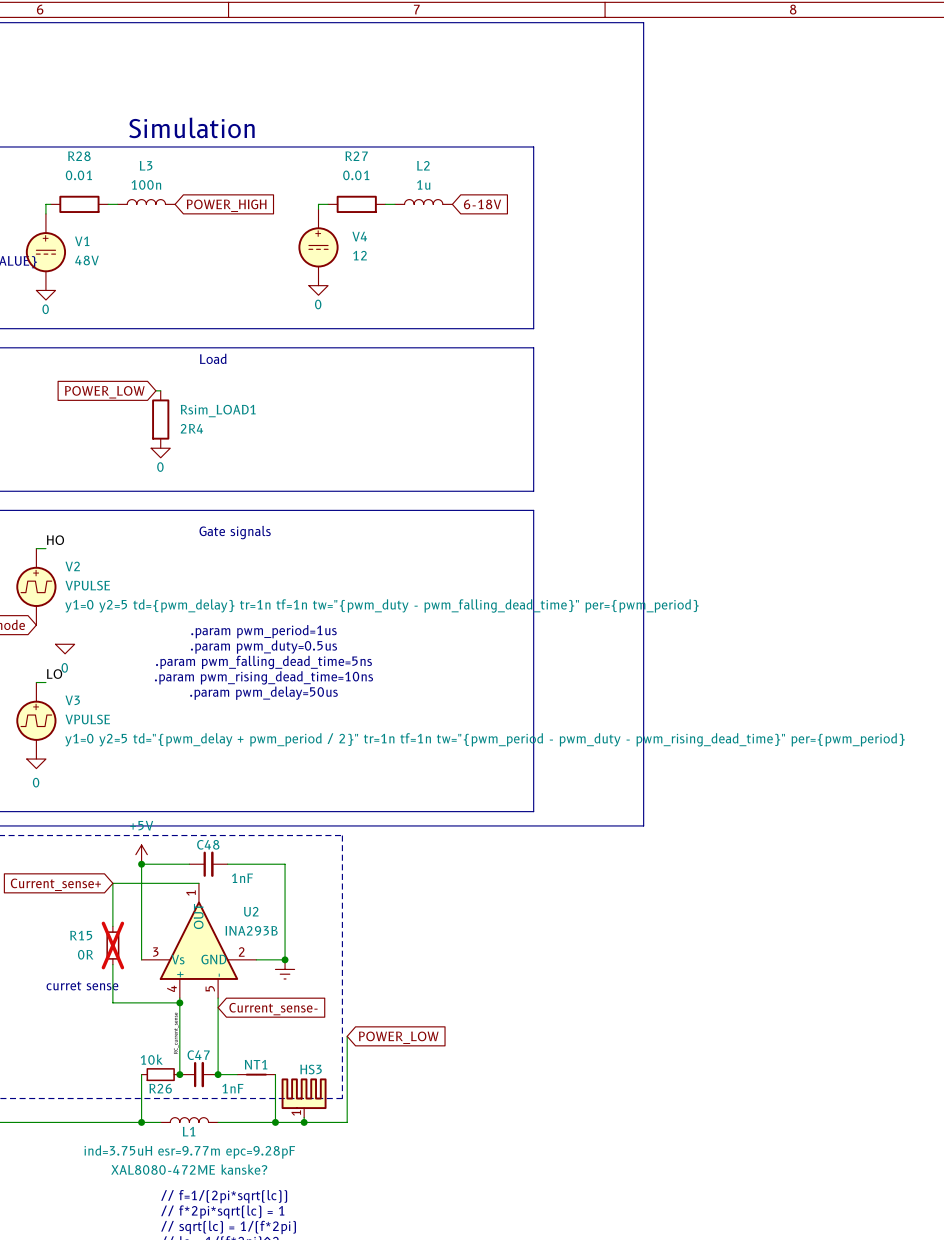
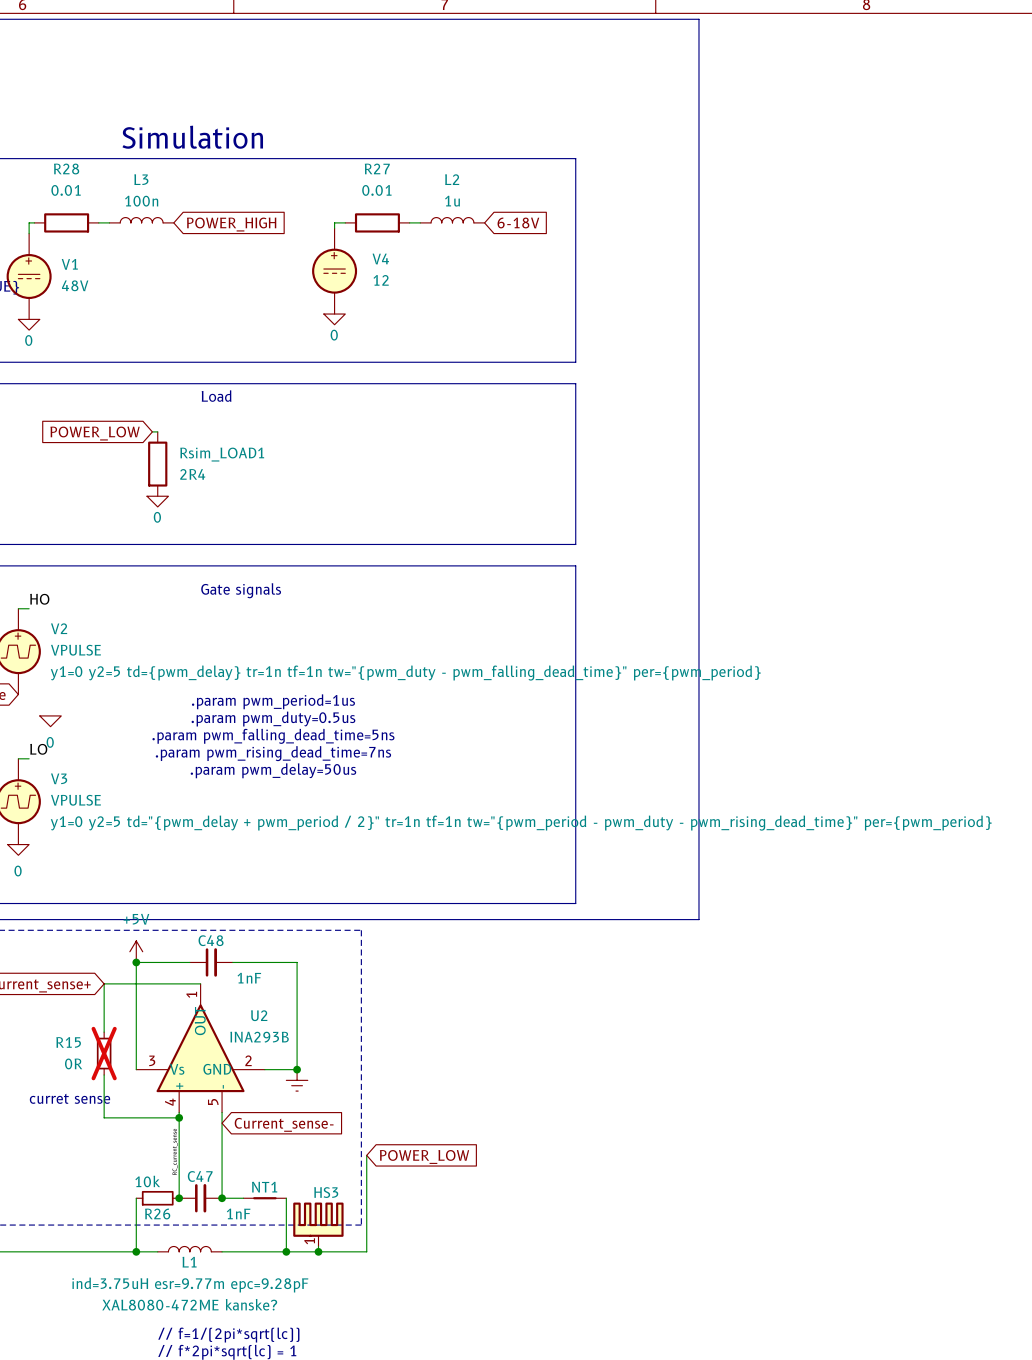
text: .param pwm_rising_dead_time=10ns (263, 677) -> .param pwm_rising_dead_time=7ns (273, 753)

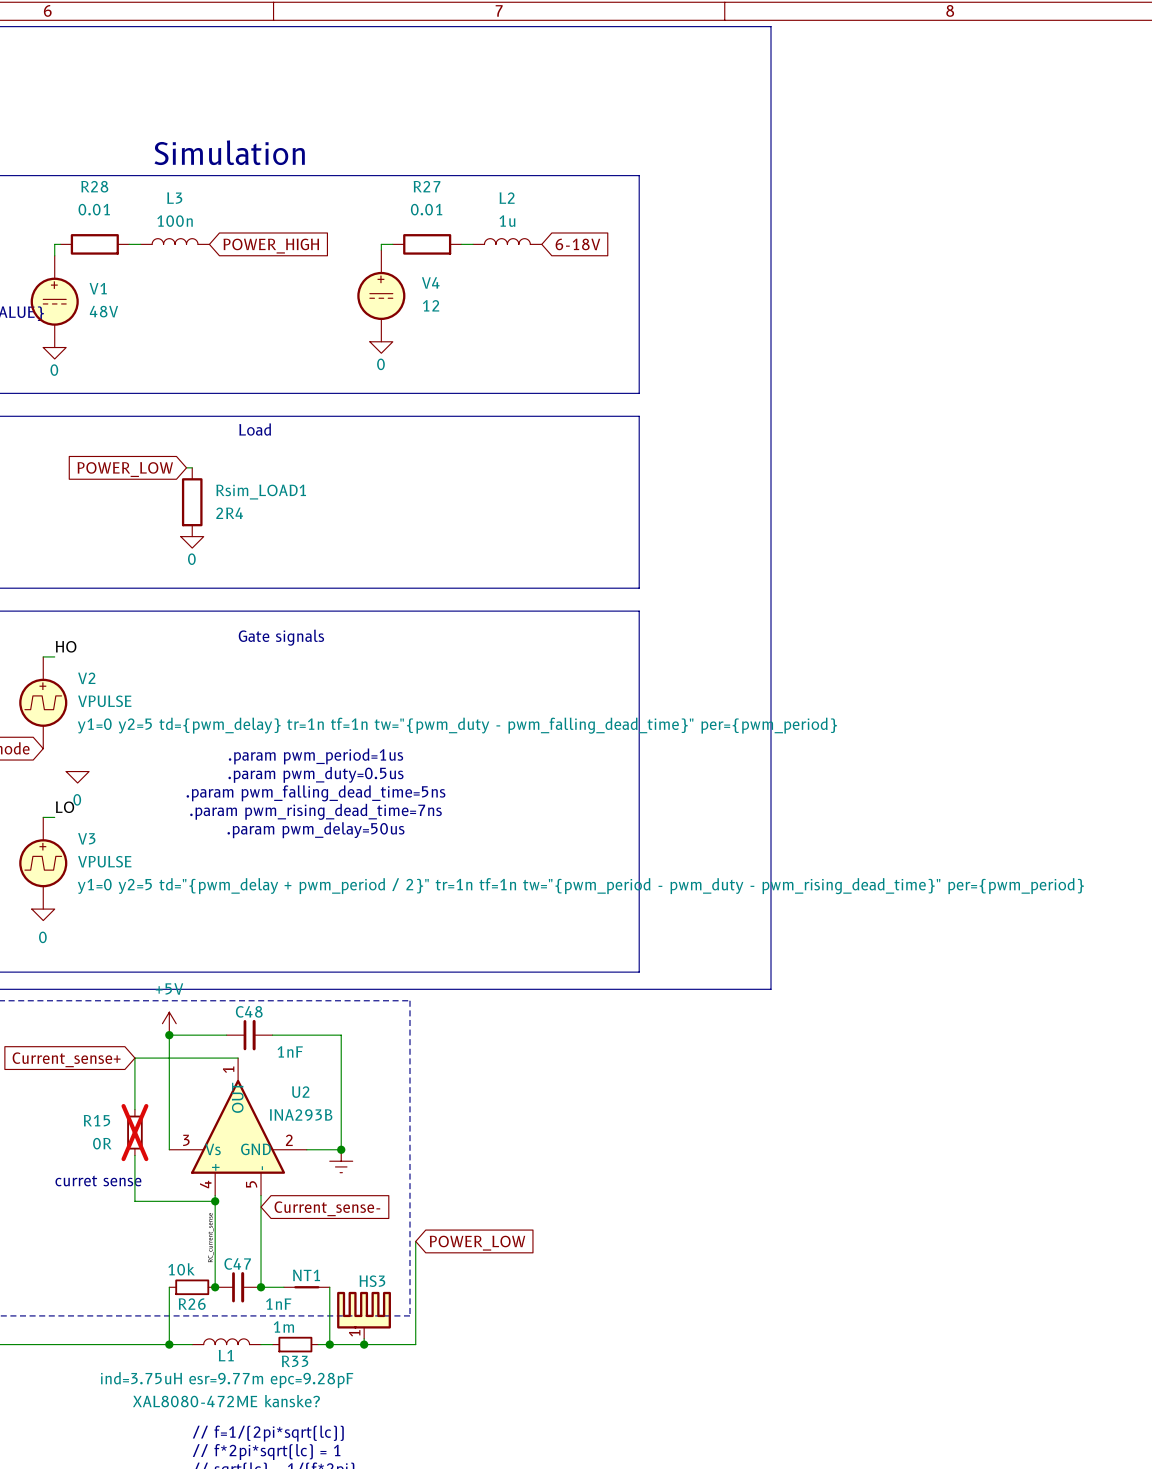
wire: (232, 1251) (275, 1251) -> none
R33: none -> 1m (295, 1344)

